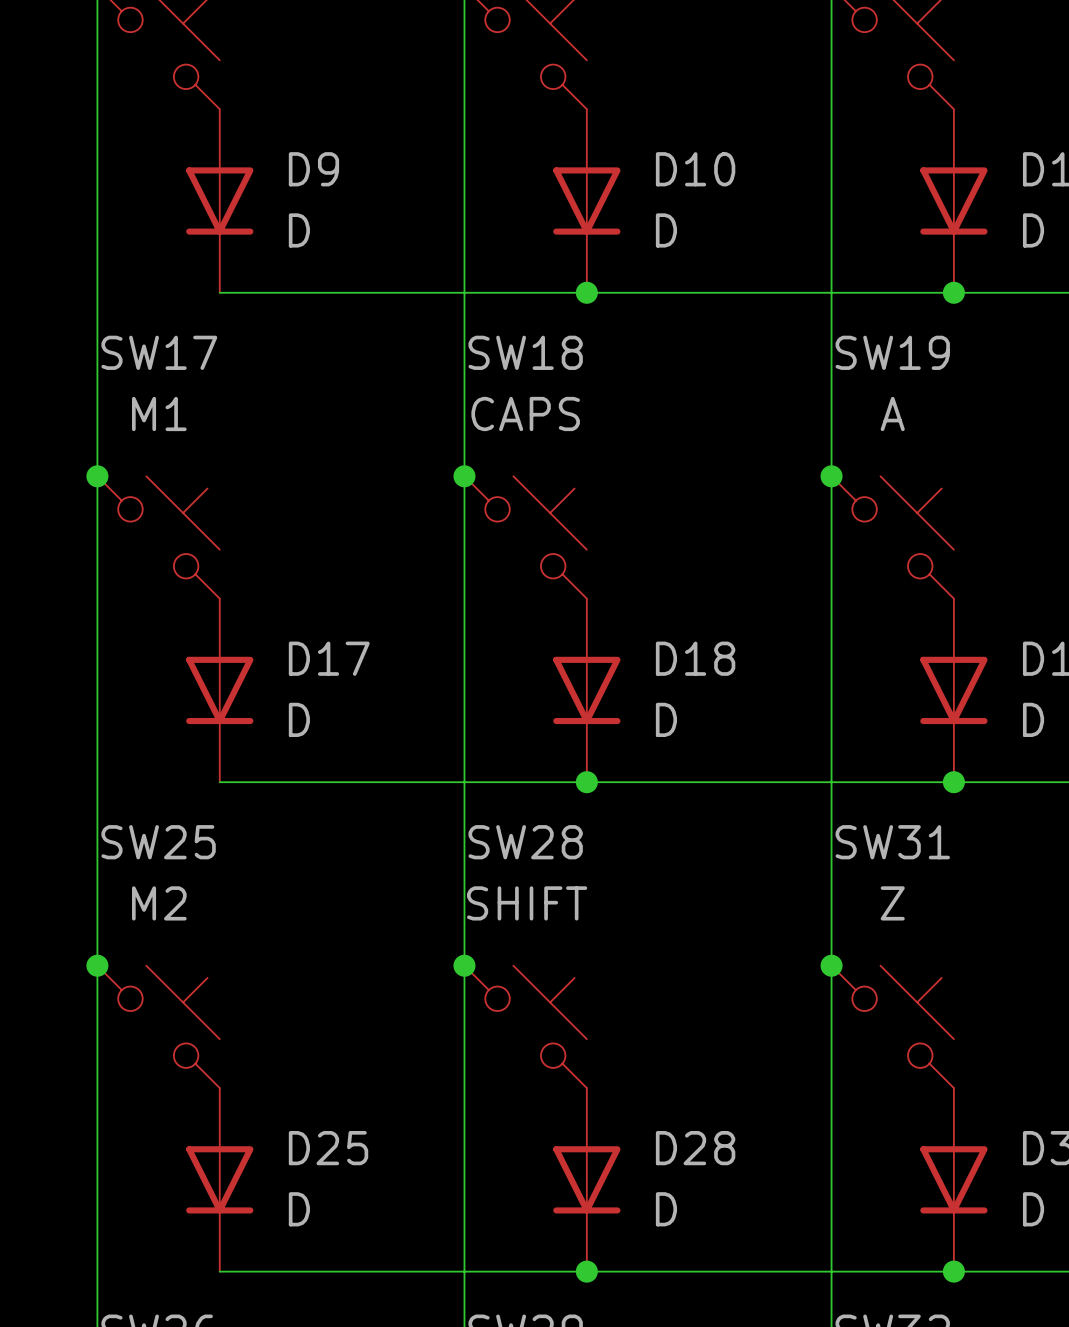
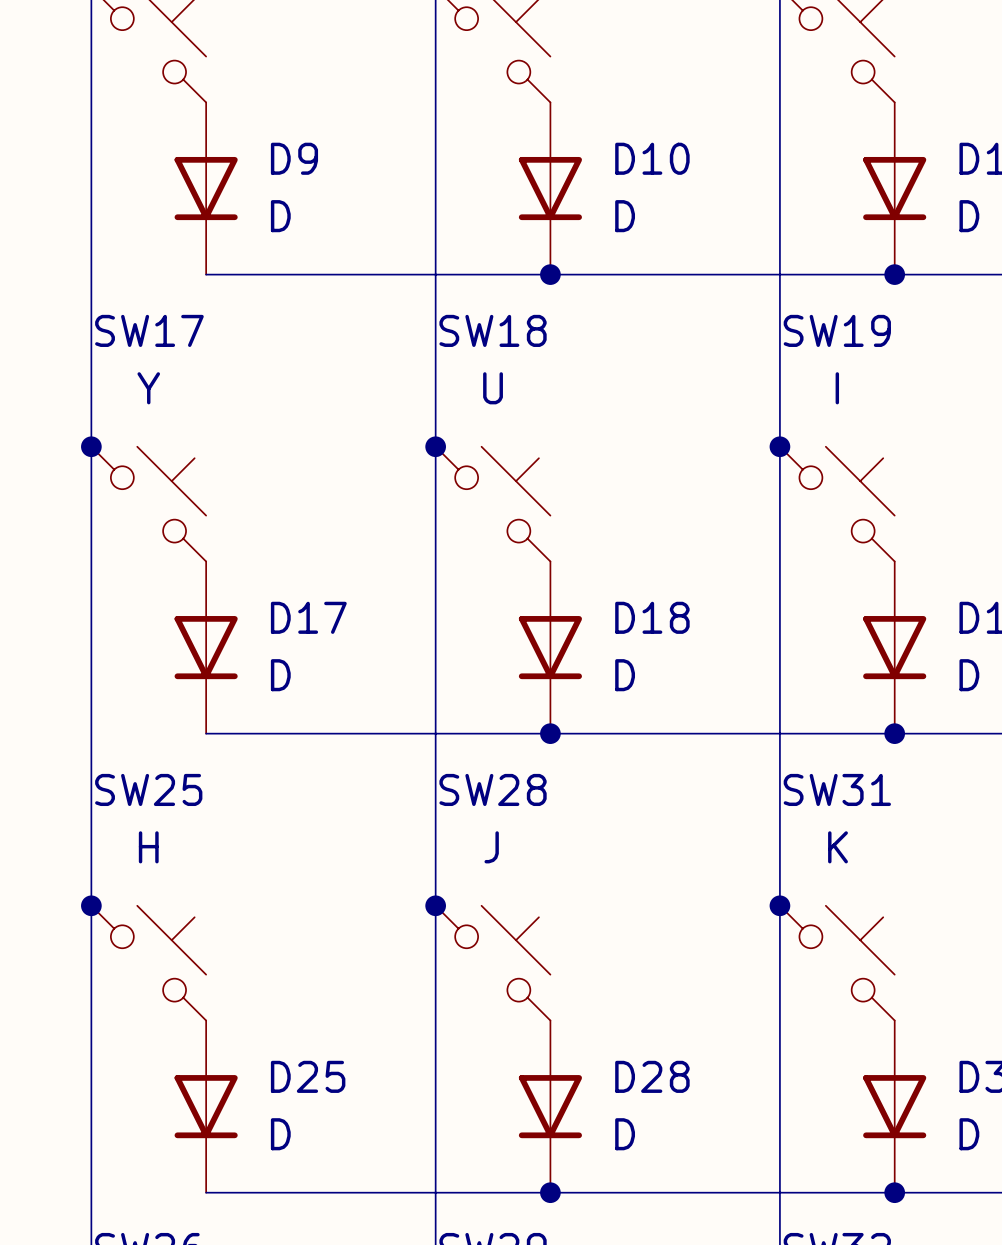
SW17 value: M1 (159, 413) -> Y (148, 388)
SW18 value: CAPS (525, 413) -> U (493, 388)
SW19 value: A (892, 413) -> I (837, 388)
SW25 value: M2 (159, 903) -> H (148, 847)
SW28 value: SHIFT (527, 903) -> J (491, 847)
SW31 value: Z (892, 903) -> K (838, 847)

